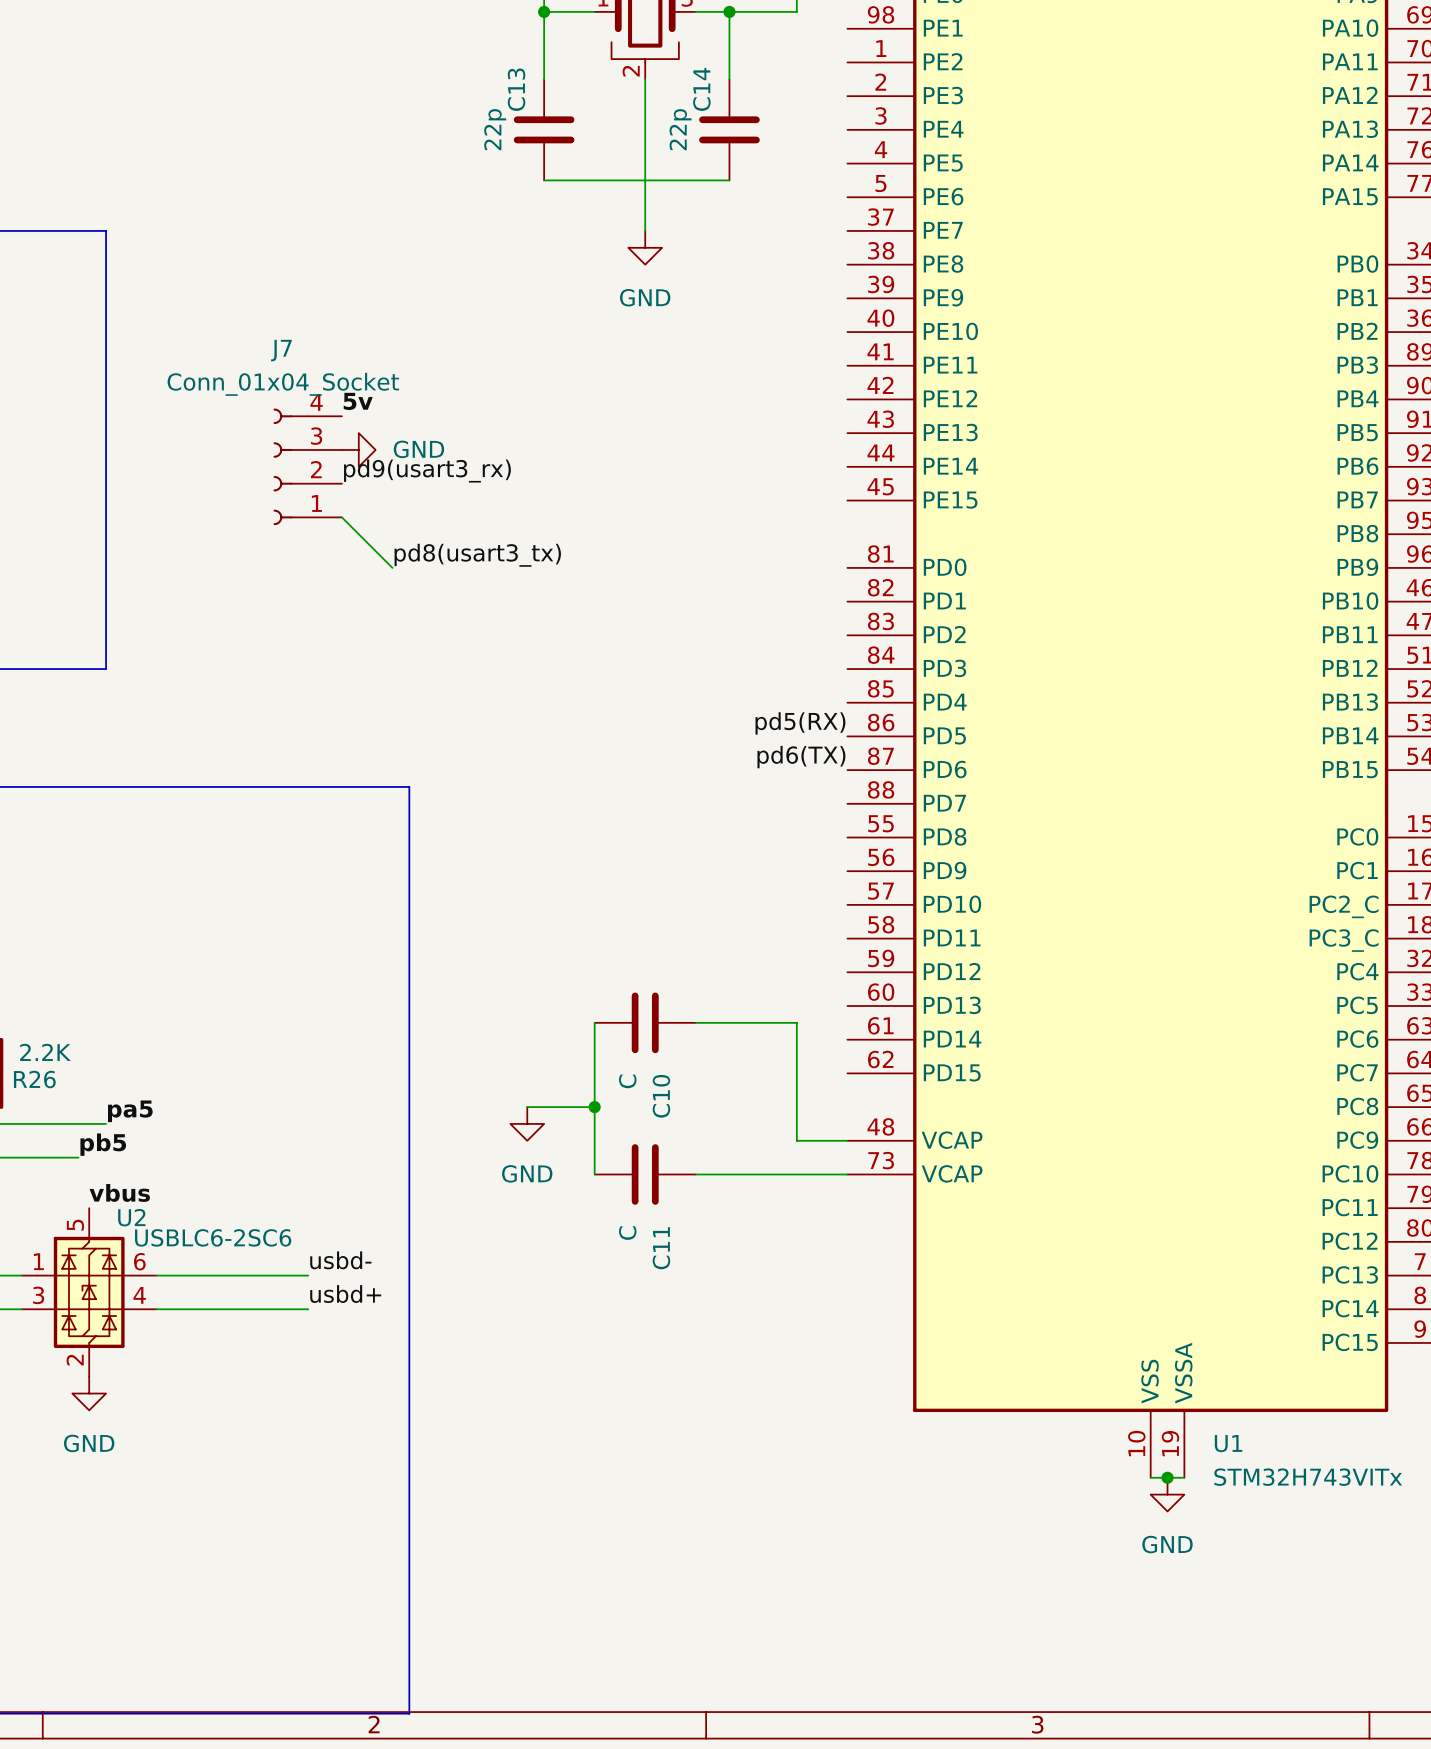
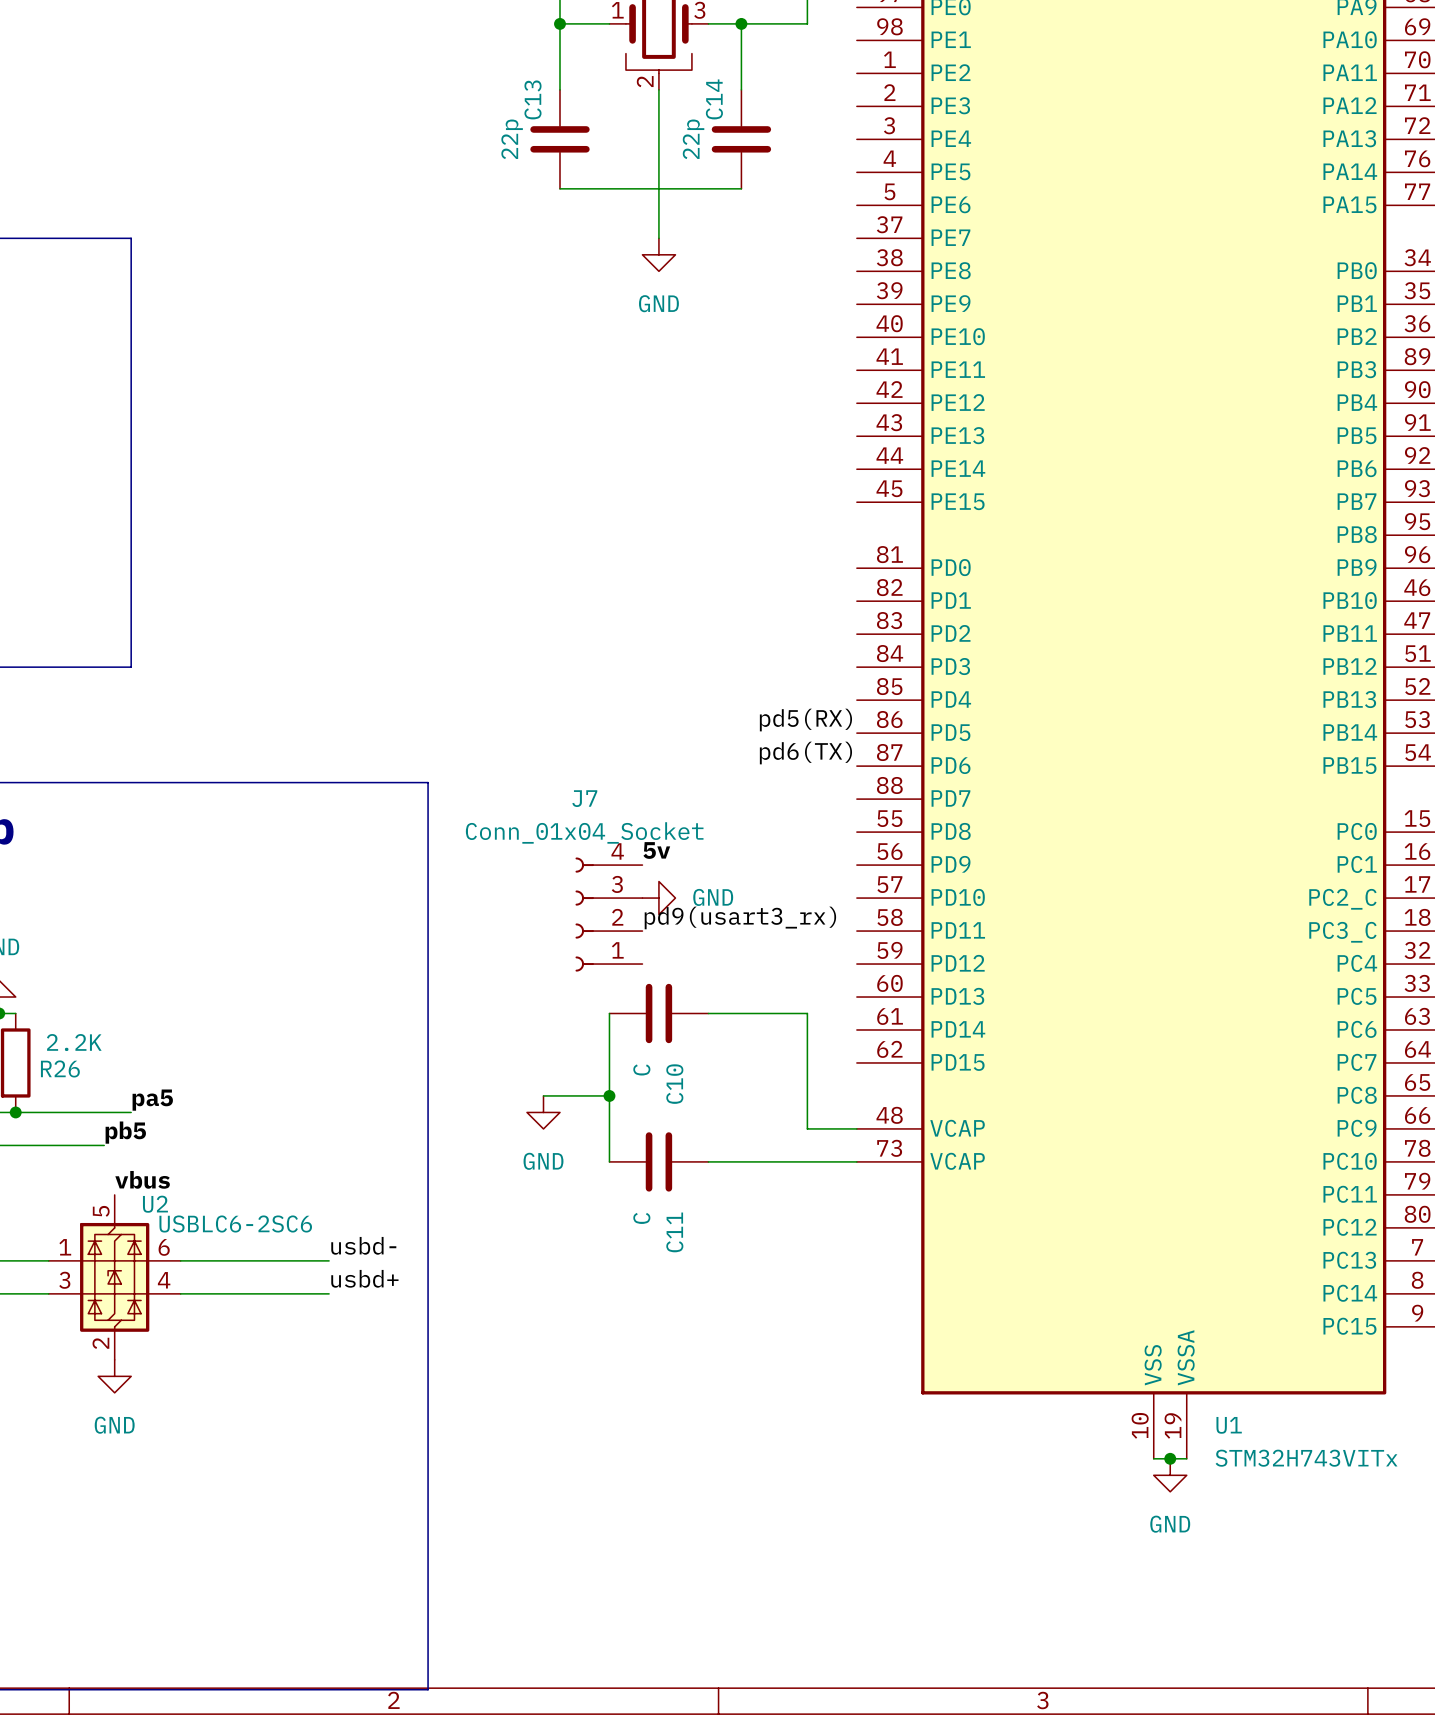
label: 5v (358, 401) -> none
power symbol: GND (358, 449) -> none
J7 position: (307, 466) -> (608, 914)
label: pd9(usart3_rx) (427, 471) -> none
wire: (341, 517) (392, 567) -> none
label: pd8(usart3_tx) (477, 555) -> none
label: none -> 5v (656, 850)
power symbol: none -> GND (658, 898)
label: none -> pd9(usart3_rx) (740, 917)

